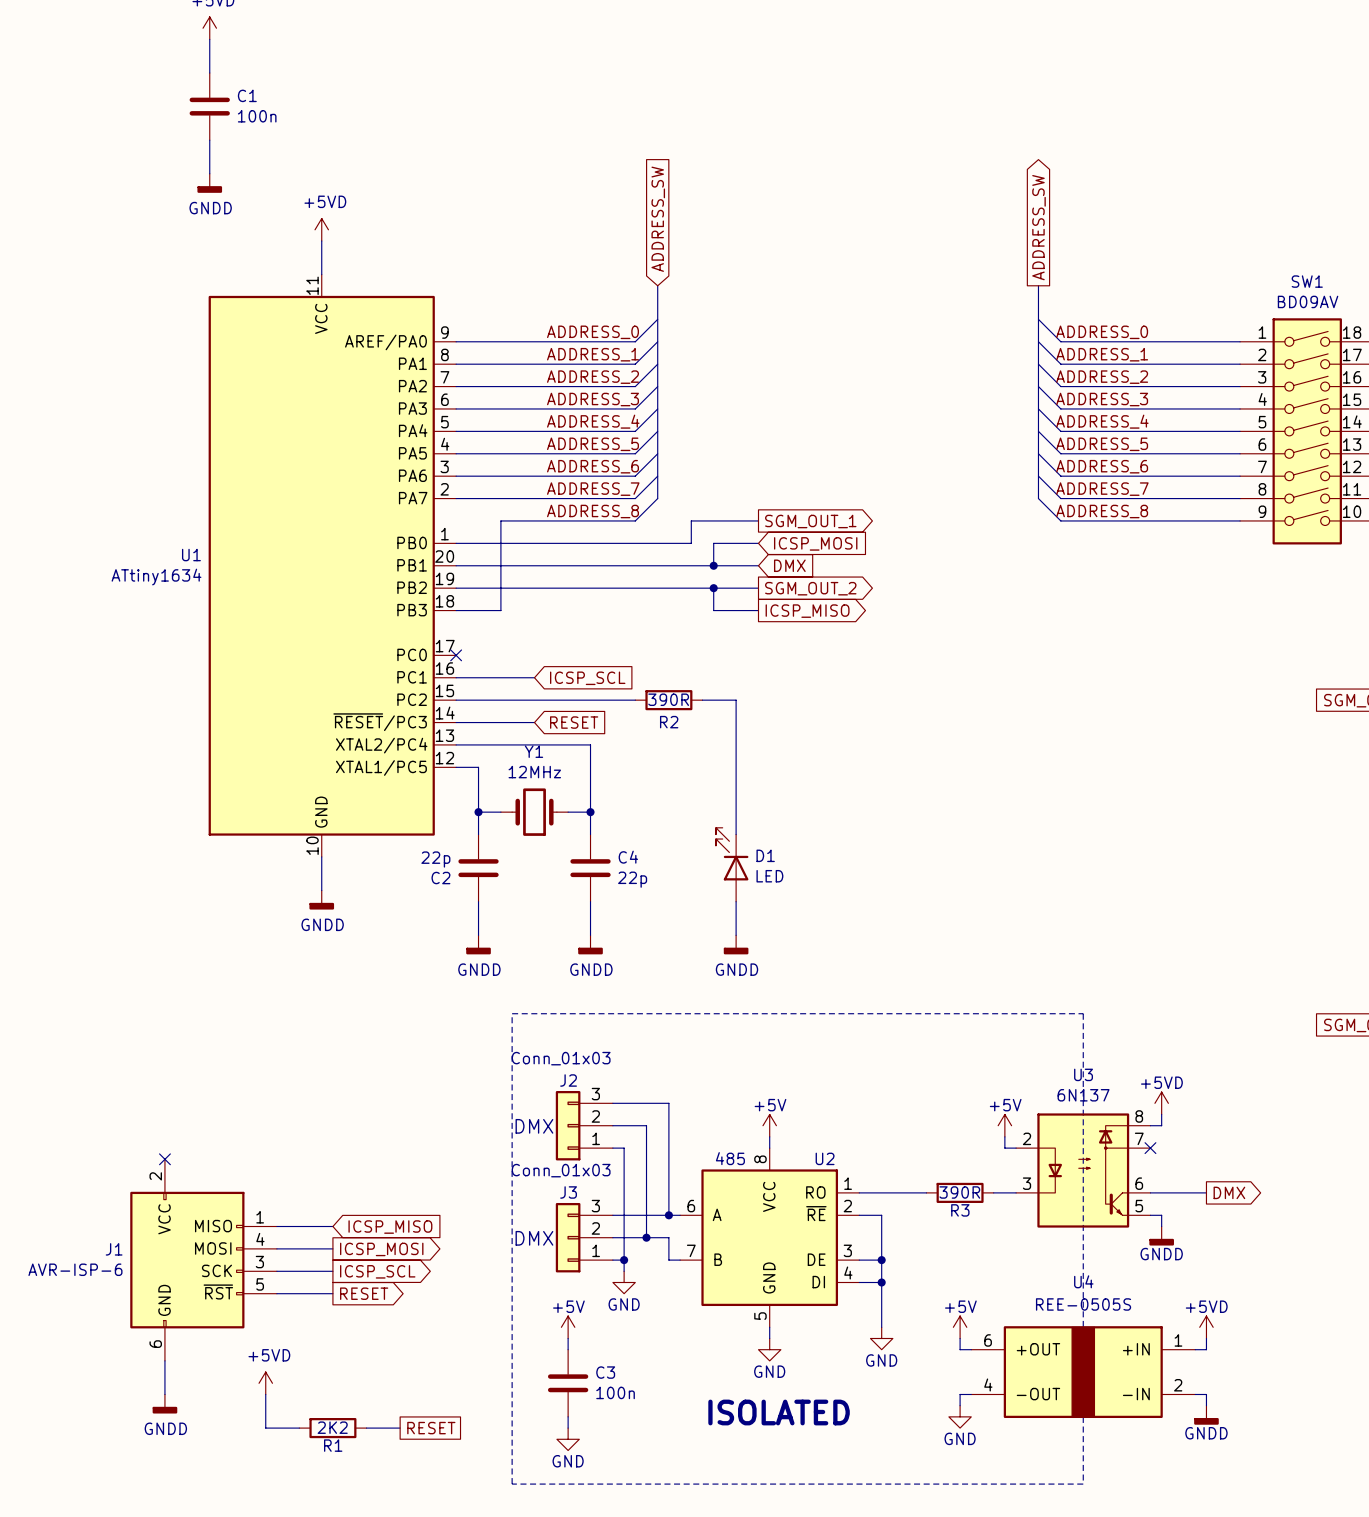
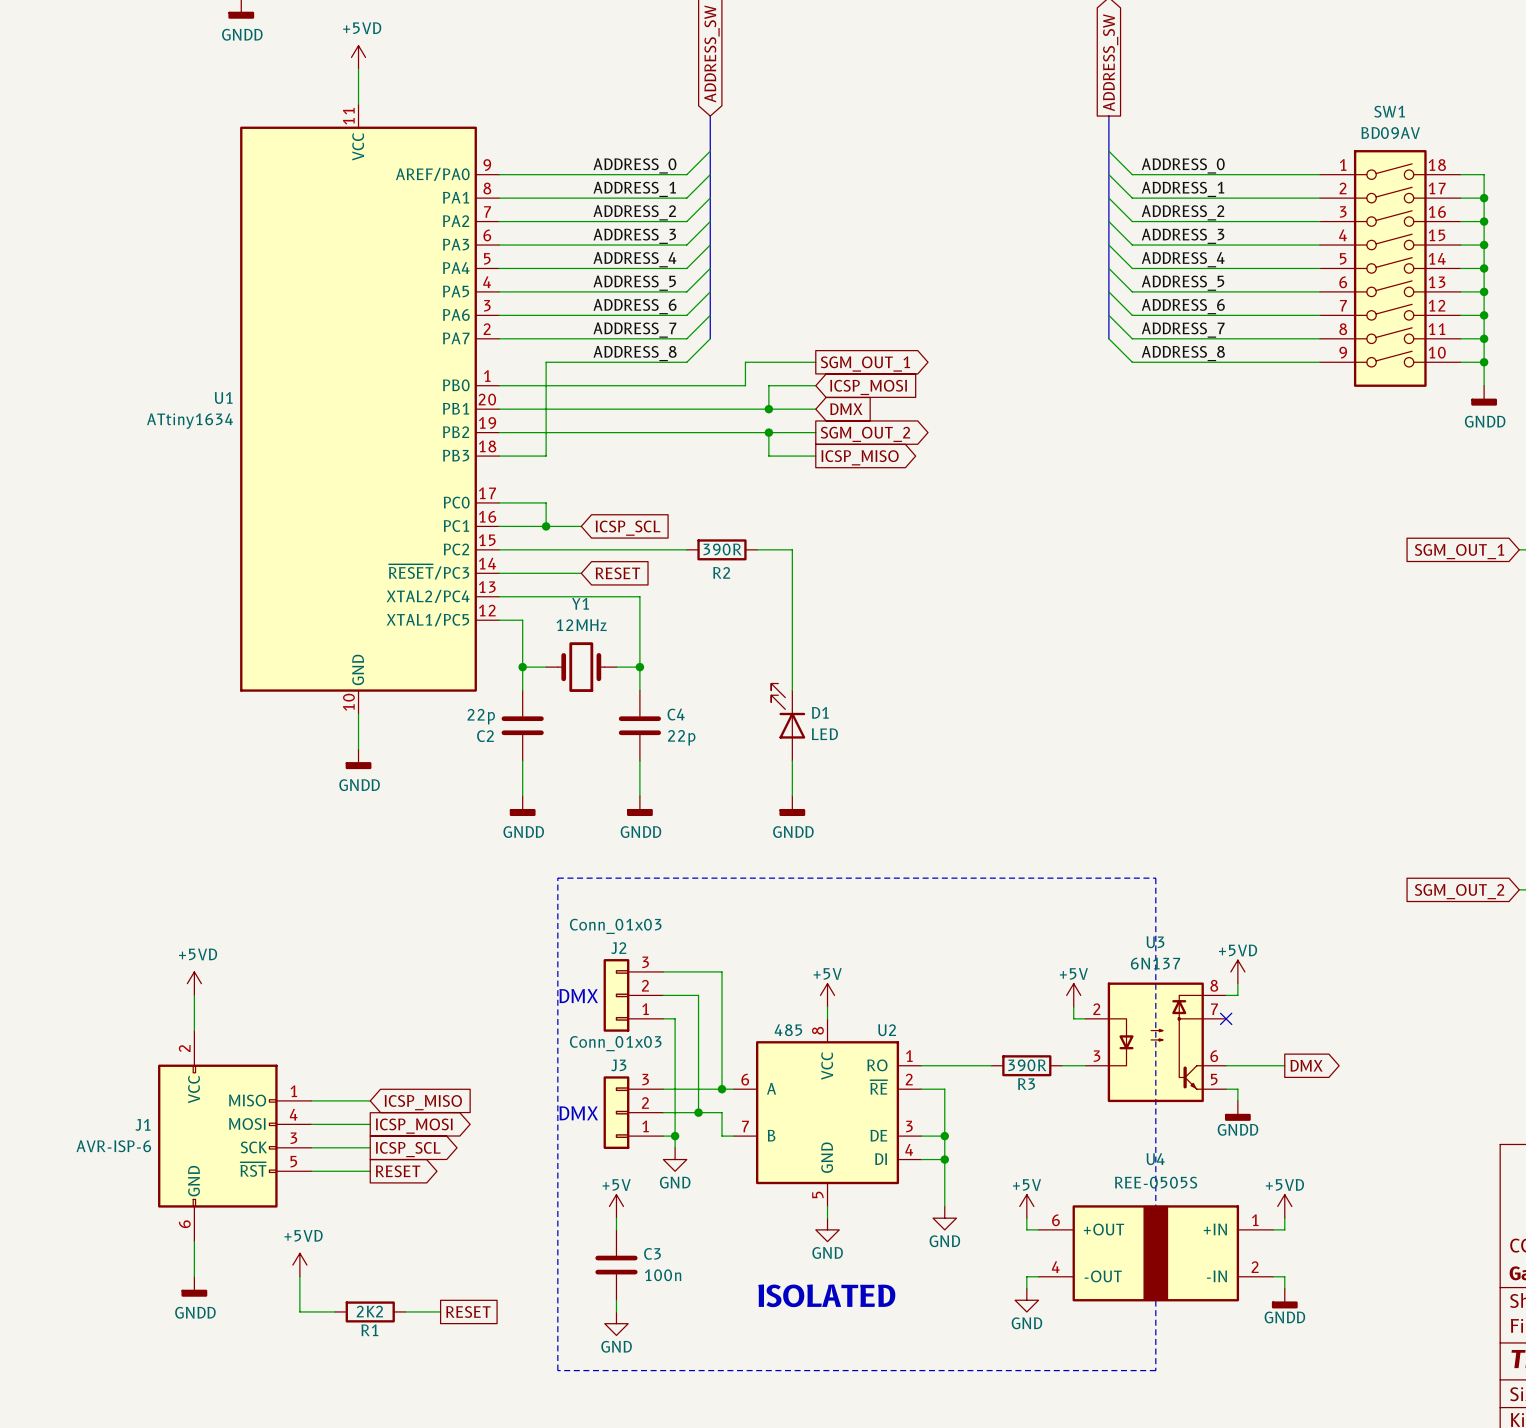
wire: none -> (499, 502) (546, 502) (546, 526)
no-connect mark: (456, 655) -> none
junction: none -> (546, 526)
power symbol: none -> +5VD (194, 983)
wire: none -> (194, 995) (194, 1030)
no-connect mark: (164, 1159) -> none

